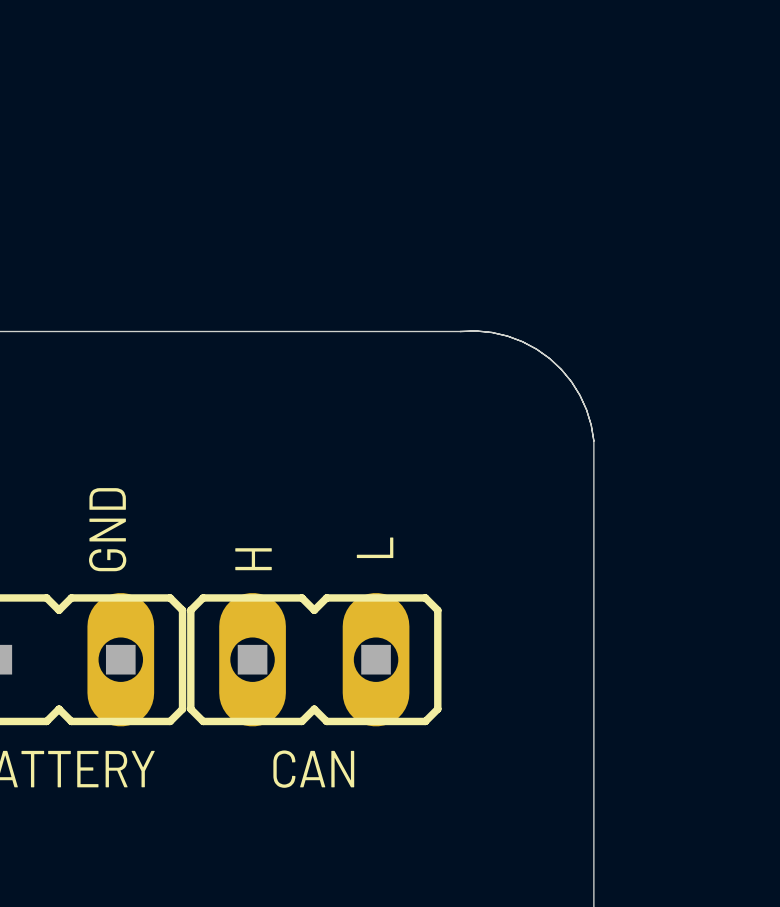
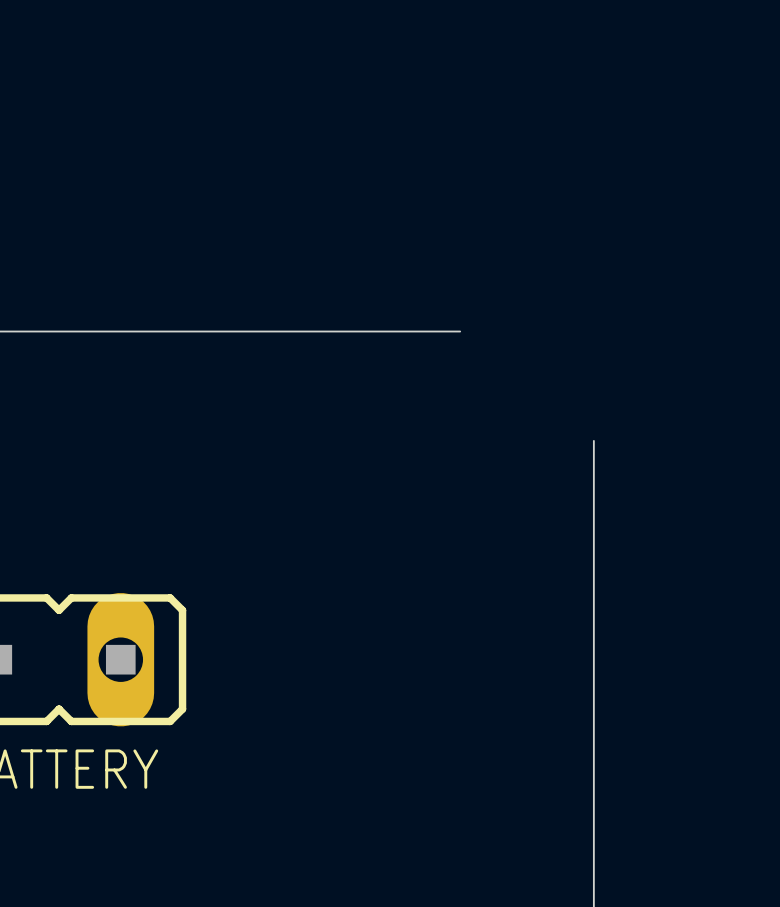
board edge: (460, 331) (492, 332) (507, 336) (536, 349) (549, 358) (571, 381) (579, 395) (591, 425) (593, 440) (591, 425) (586, 409) (579, 395) (571, 381) (561, 369) (549, 358) (536, 349) (522, 341) (507, 336) (492, 332) (476, 330) (460, 331) -> none
text: GND (107, 529) -> none
text: L (375, 547) -> none
text: H (253, 559) -> none
CAN: (314, 659) -> none

